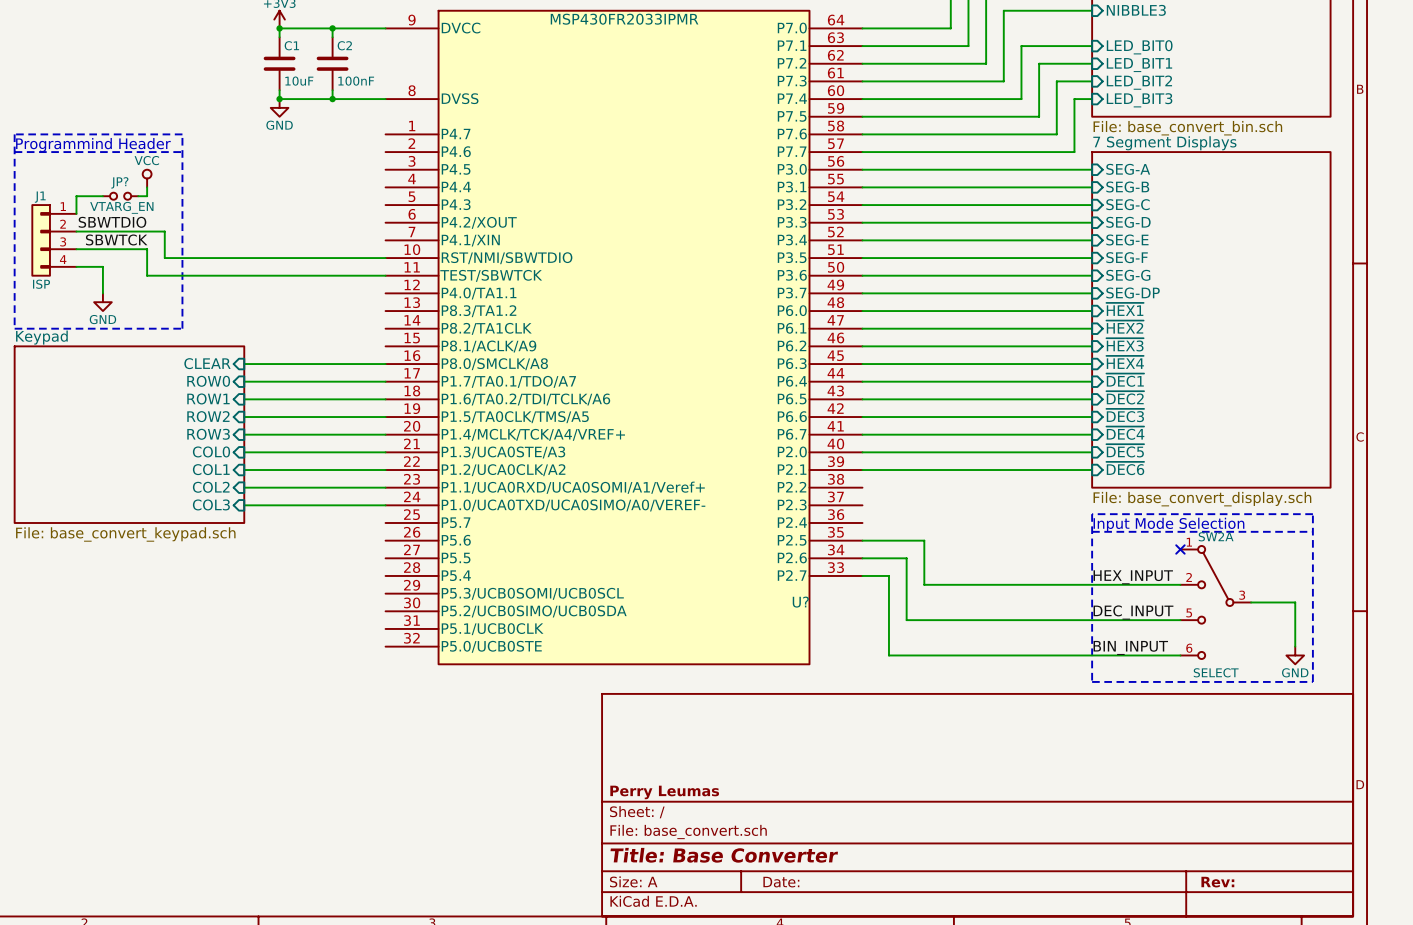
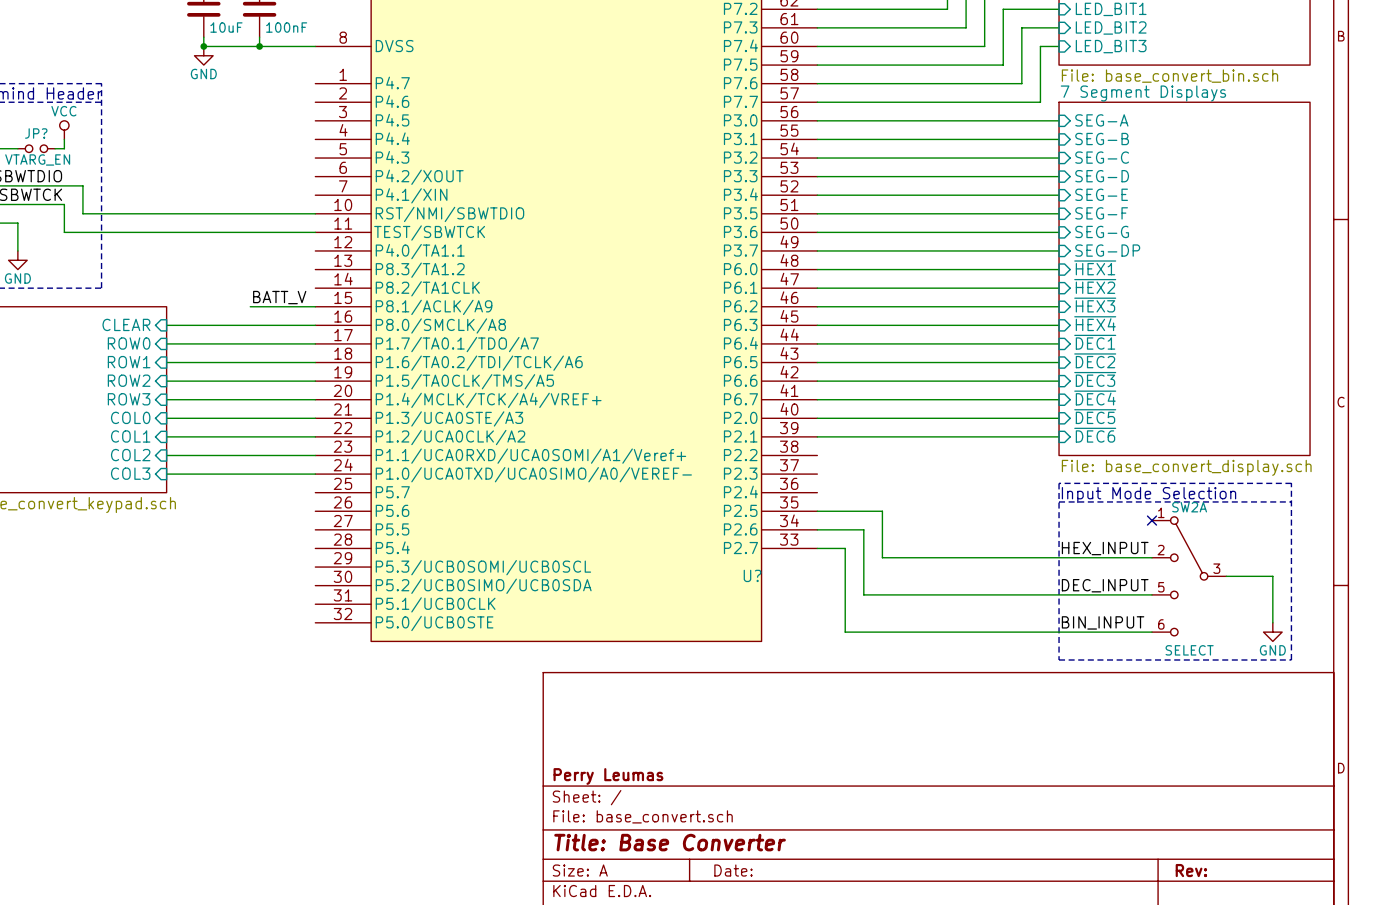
label: none -> BATT_V (279, 297)
wire: none -> (250, 306) (315, 306)

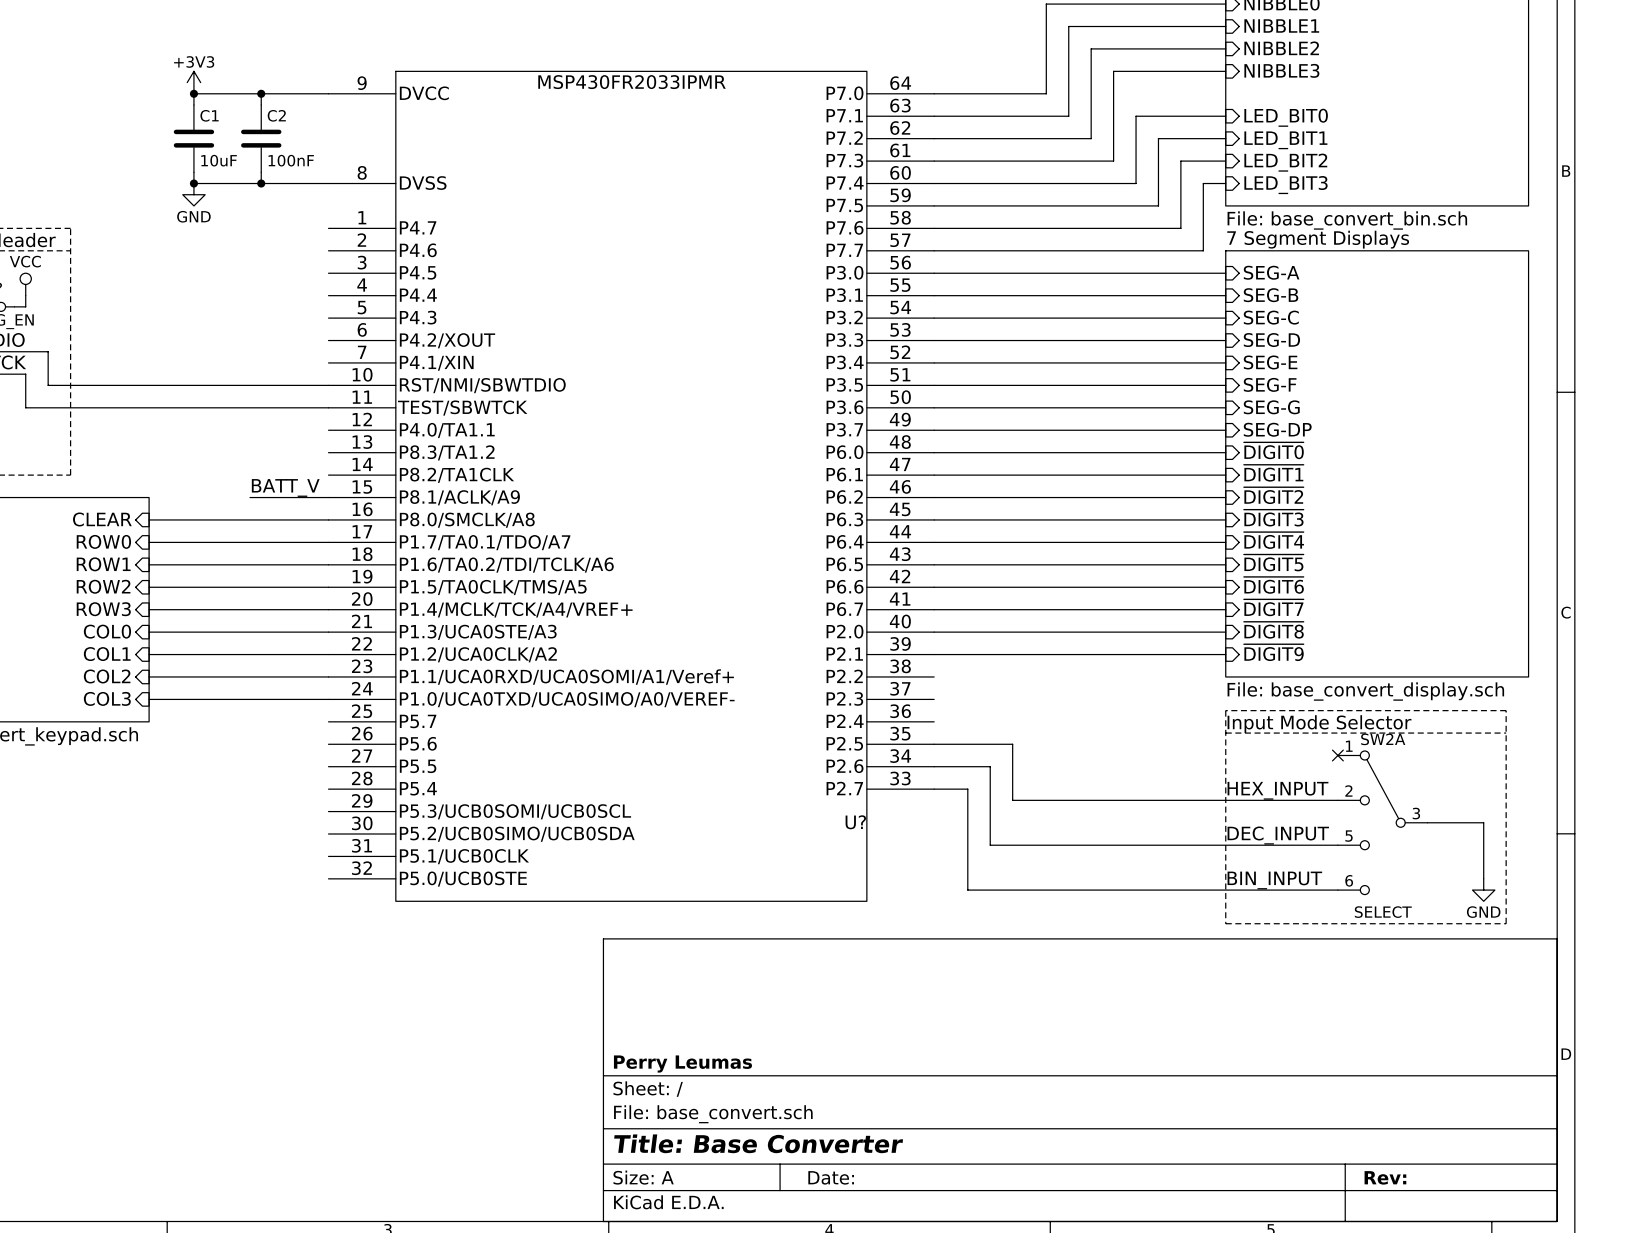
sheet pin: ~{HEX1} (1095, 267) -> ~{DIGIT0} (1273, 450)
sheet pin: ~{HEX2} (1095, 286) -> ~{DIGIT1} (1273, 473)
sheet pin: ~{HEX3} (1095, 305) -> ~{DIGIT2} (1273, 495)
sheet pin: ~{HEX4} (1095, 323) -> ~{DIGIT3} (1273, 518)
sheet pin: ~{DEC1} (1095, 342) -> ~{DIGIT4} (1273, 540)
sheet pin: ~{DEC2} (1095, 360) -> ~{DIGIT5} (1273, 562)
sheet pin: ~{DEC3} (1095, 379) -> ~{DIGIT6} (1273, 585)
sheet pin: ~{DEC4} (1095, 398) -> ~{DIGIT7} (1273, 607)
sheet pin: ~{DEC5} (1095, 416) -> ~{DIGIT8} (1273, 630)
sheet pin: ~{DEC6} (1095, 435) -> ~{DIGIT9} (1273, 652)
text: Input Mode Selection (1149, 495) -> Input Mode Selector (1319, 724)

